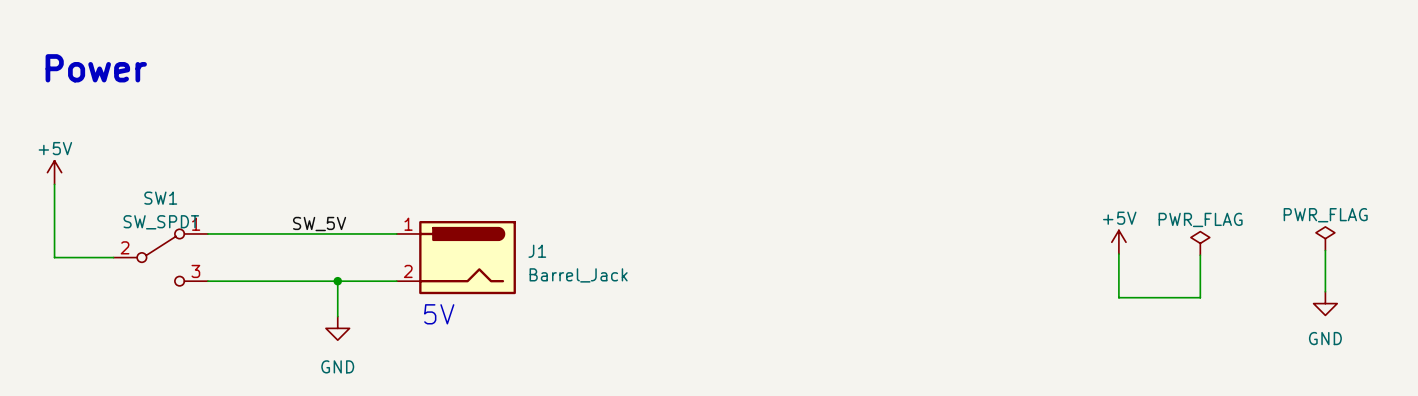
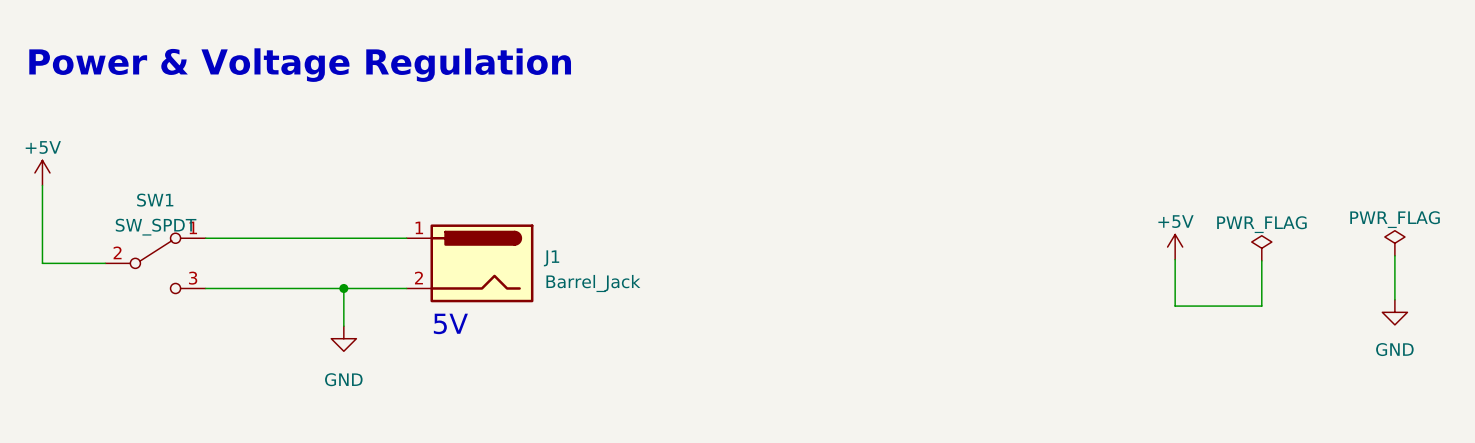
text: Power (96, 68) -> Power & Voltage Regulation (300, 65)
label: SW_5V (319, 224) -> none

